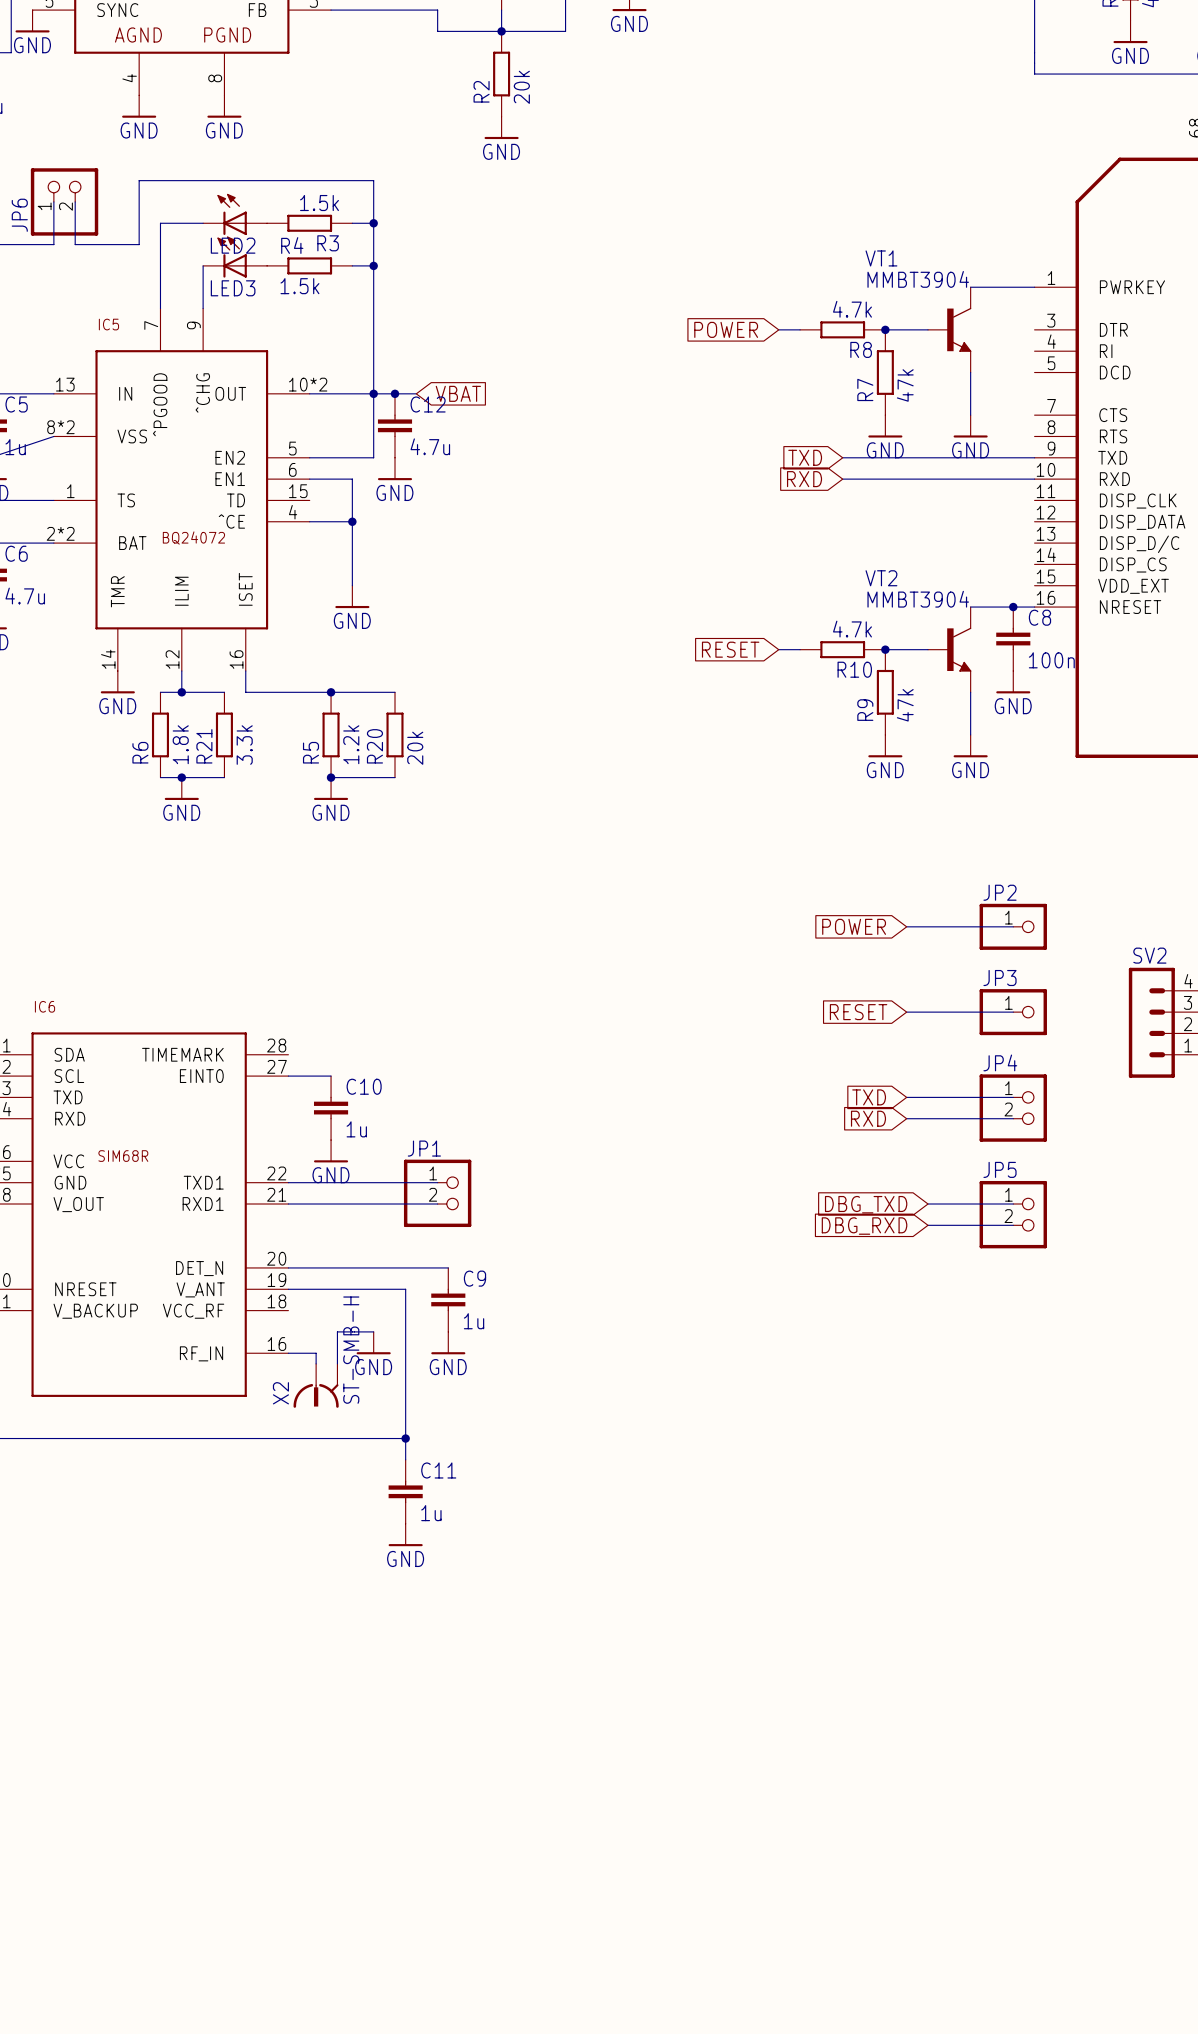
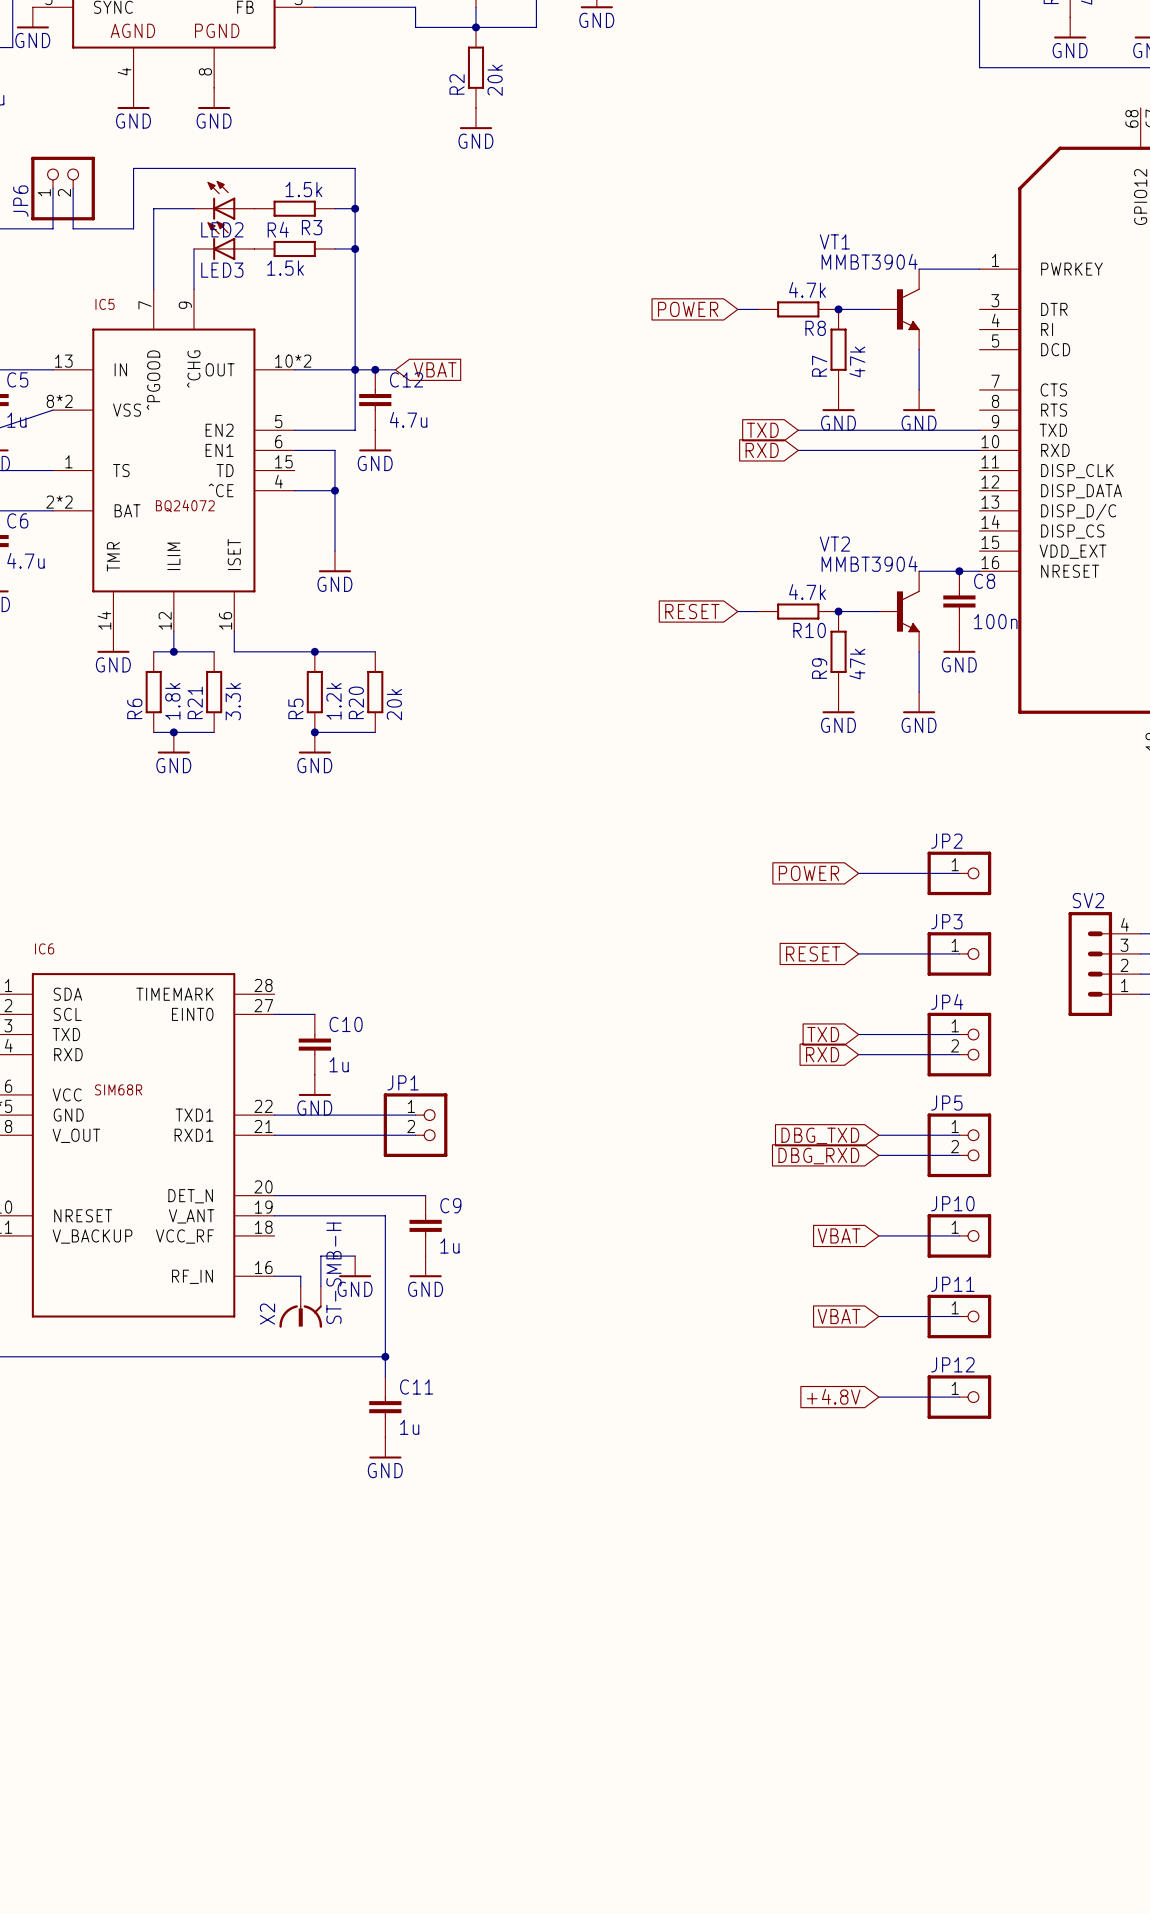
global label: none -> VBAT (839, 1235)
wire: none -> (878, 1235) (959, 1235)
JP10: none -> (959, 1235)
global label: none -> VBAT (839, 1316)
wire: none -> (878, 1316) (959, 1316)
JP11: none -> (959, 1316)
global label: none -> +4.8V (833, 1396)
wire: none -> (878, 1397) (959, 1397)
JP12: none -> (959, 1397)

